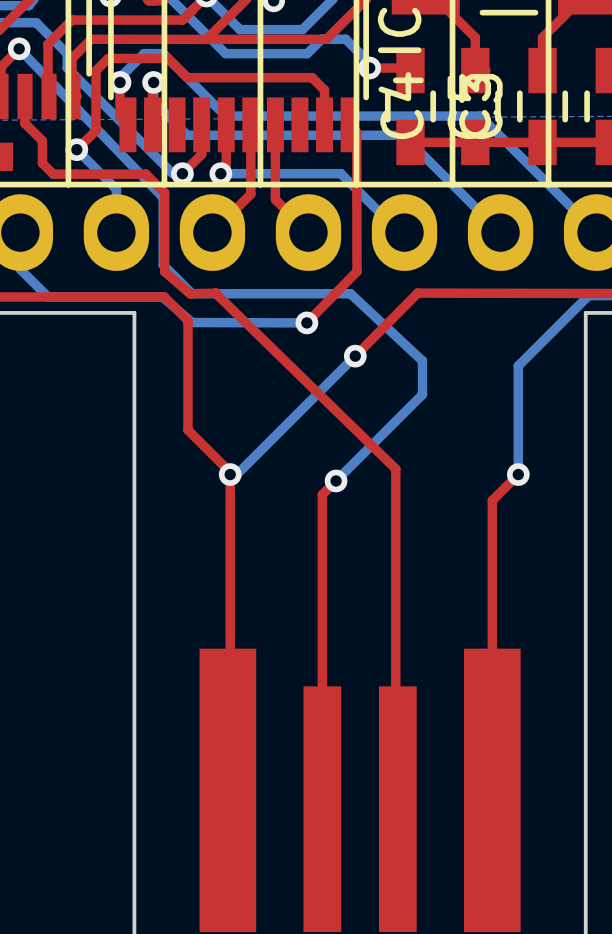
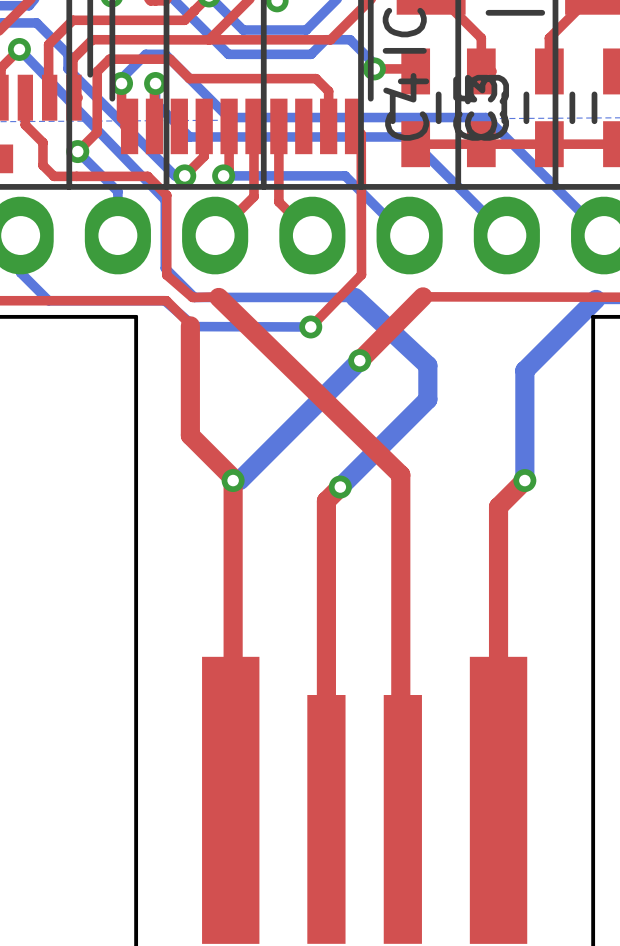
top track width: thin (216, 293) (395, 468) (395, 807) -> thick (218, 297) (400, 474) (400, 817)
bottom track width: thin (350, 293) (422, 360) (422, 394) (336, 480) -> thick (354, 297) (427, 365) (427, 399) (340, 487)
top track width: thin (417, 293) (355, 356) -> thick (422, 296) (359, 360)
bottom track width: thin (588, 295) (518, 365) (518, 474) -> thick (596, 299) (524, 370) (524, 480)
top track width: thin (188, 321) (188, 430) (230, 472) -> thick (190, 325) (190, 435) (233, 478)
bottom track width: thin (355, 356) (236, 474) -> thick (359, 360) (239, 480)
top track width: thin (230, 474) (230, 788) -> thick (233, 480) (233, 797)
top track width: thin (518, 474) (492, 500) (492, 790) -> thick (524, 480) (498, 506) (498, 800)
top track width: thin (336, 480) (322, 494) (322, 809) -> thick (340, 487) (326, 500) (326, 819)

